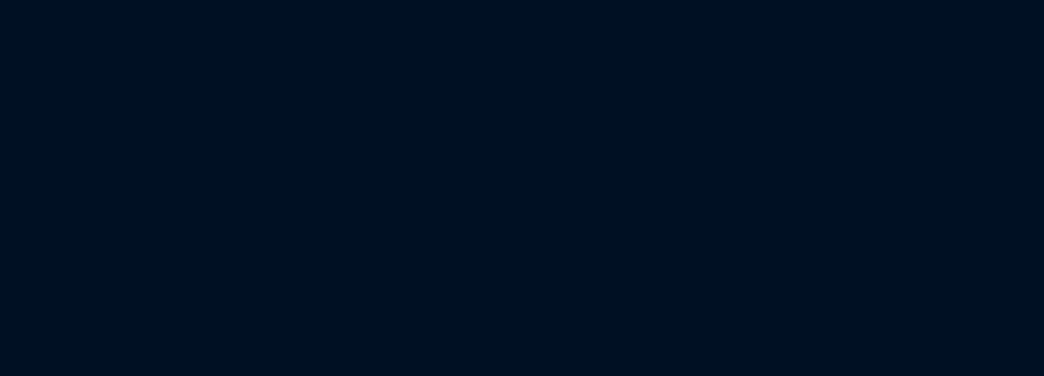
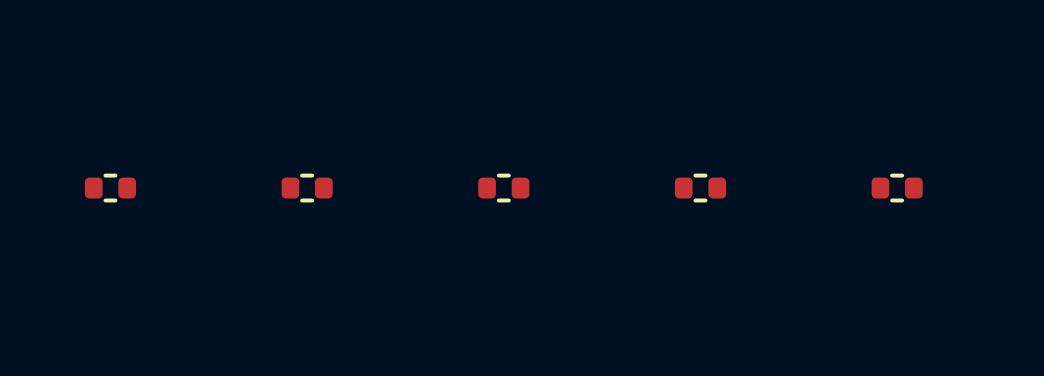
part: none -> (110, 188)
part: none -> (307, 188)
part: none -> (503, 188)
part: none -> (700, 188)
part: none -> (897, 188)

